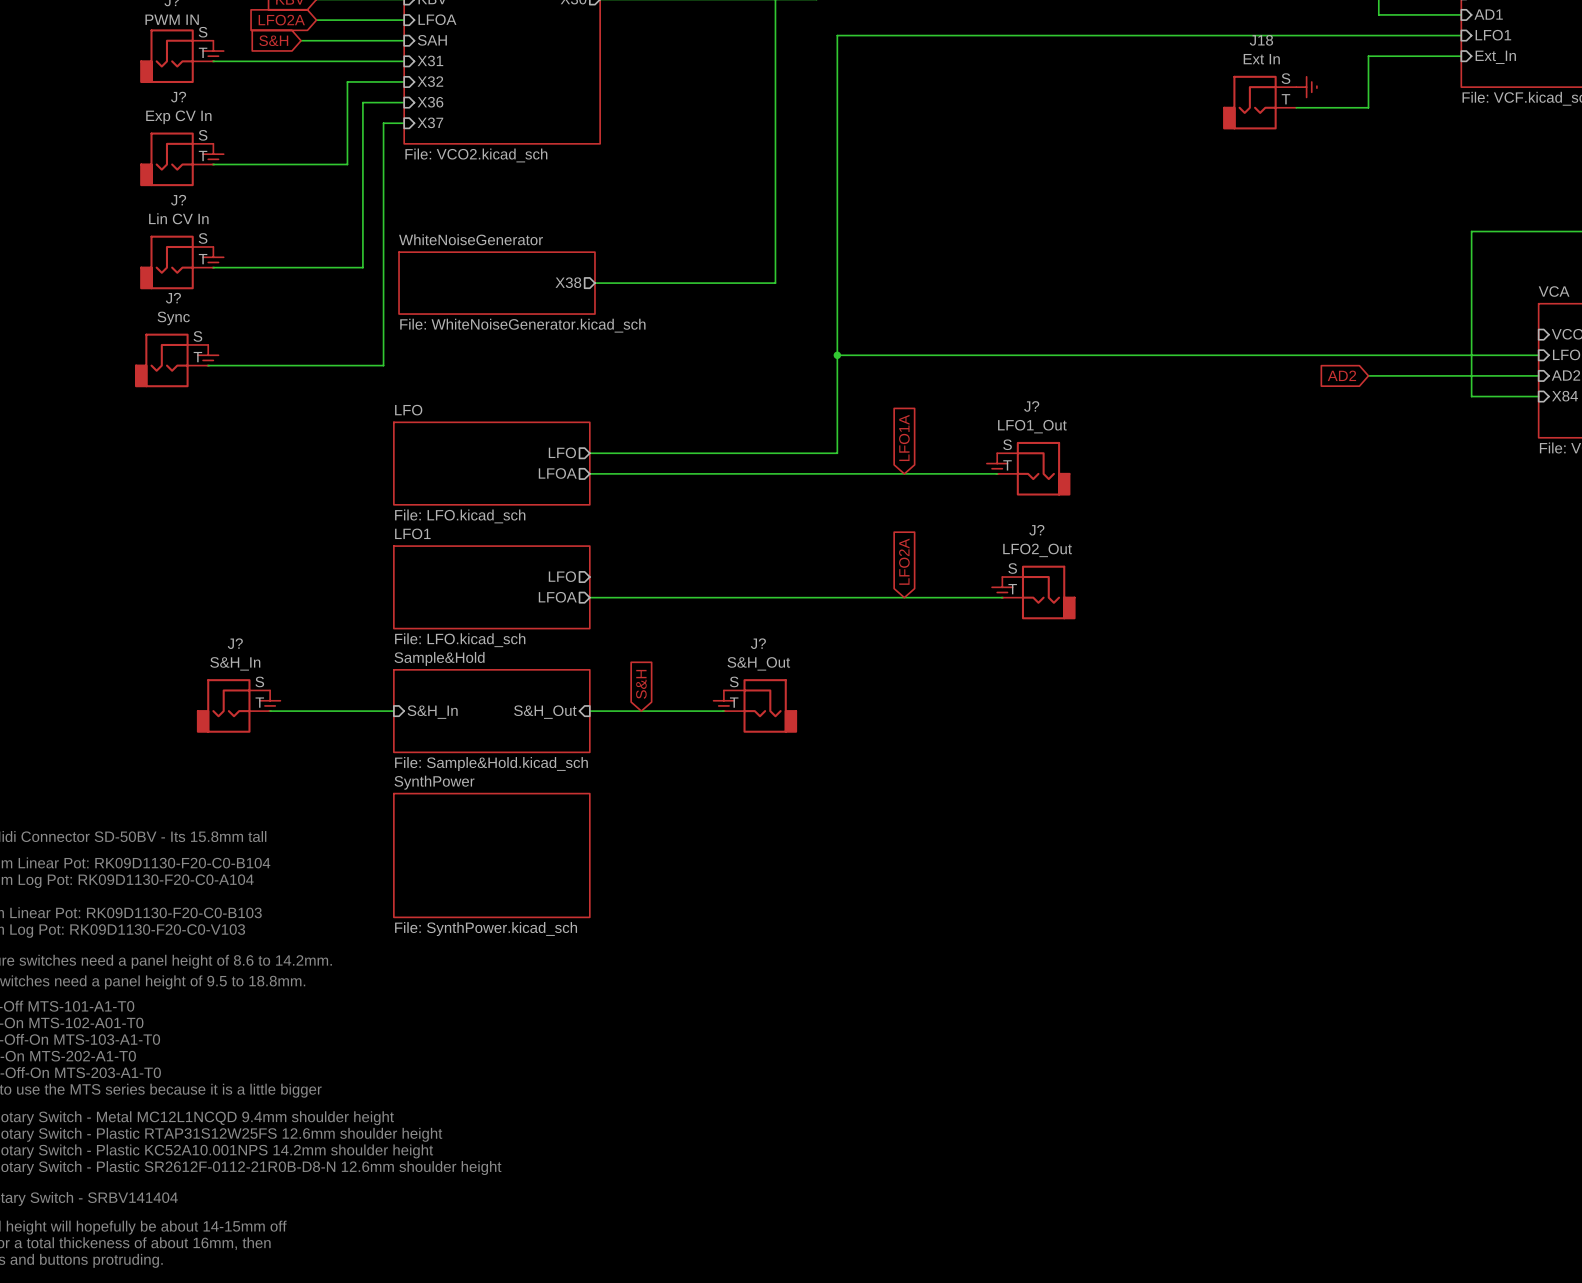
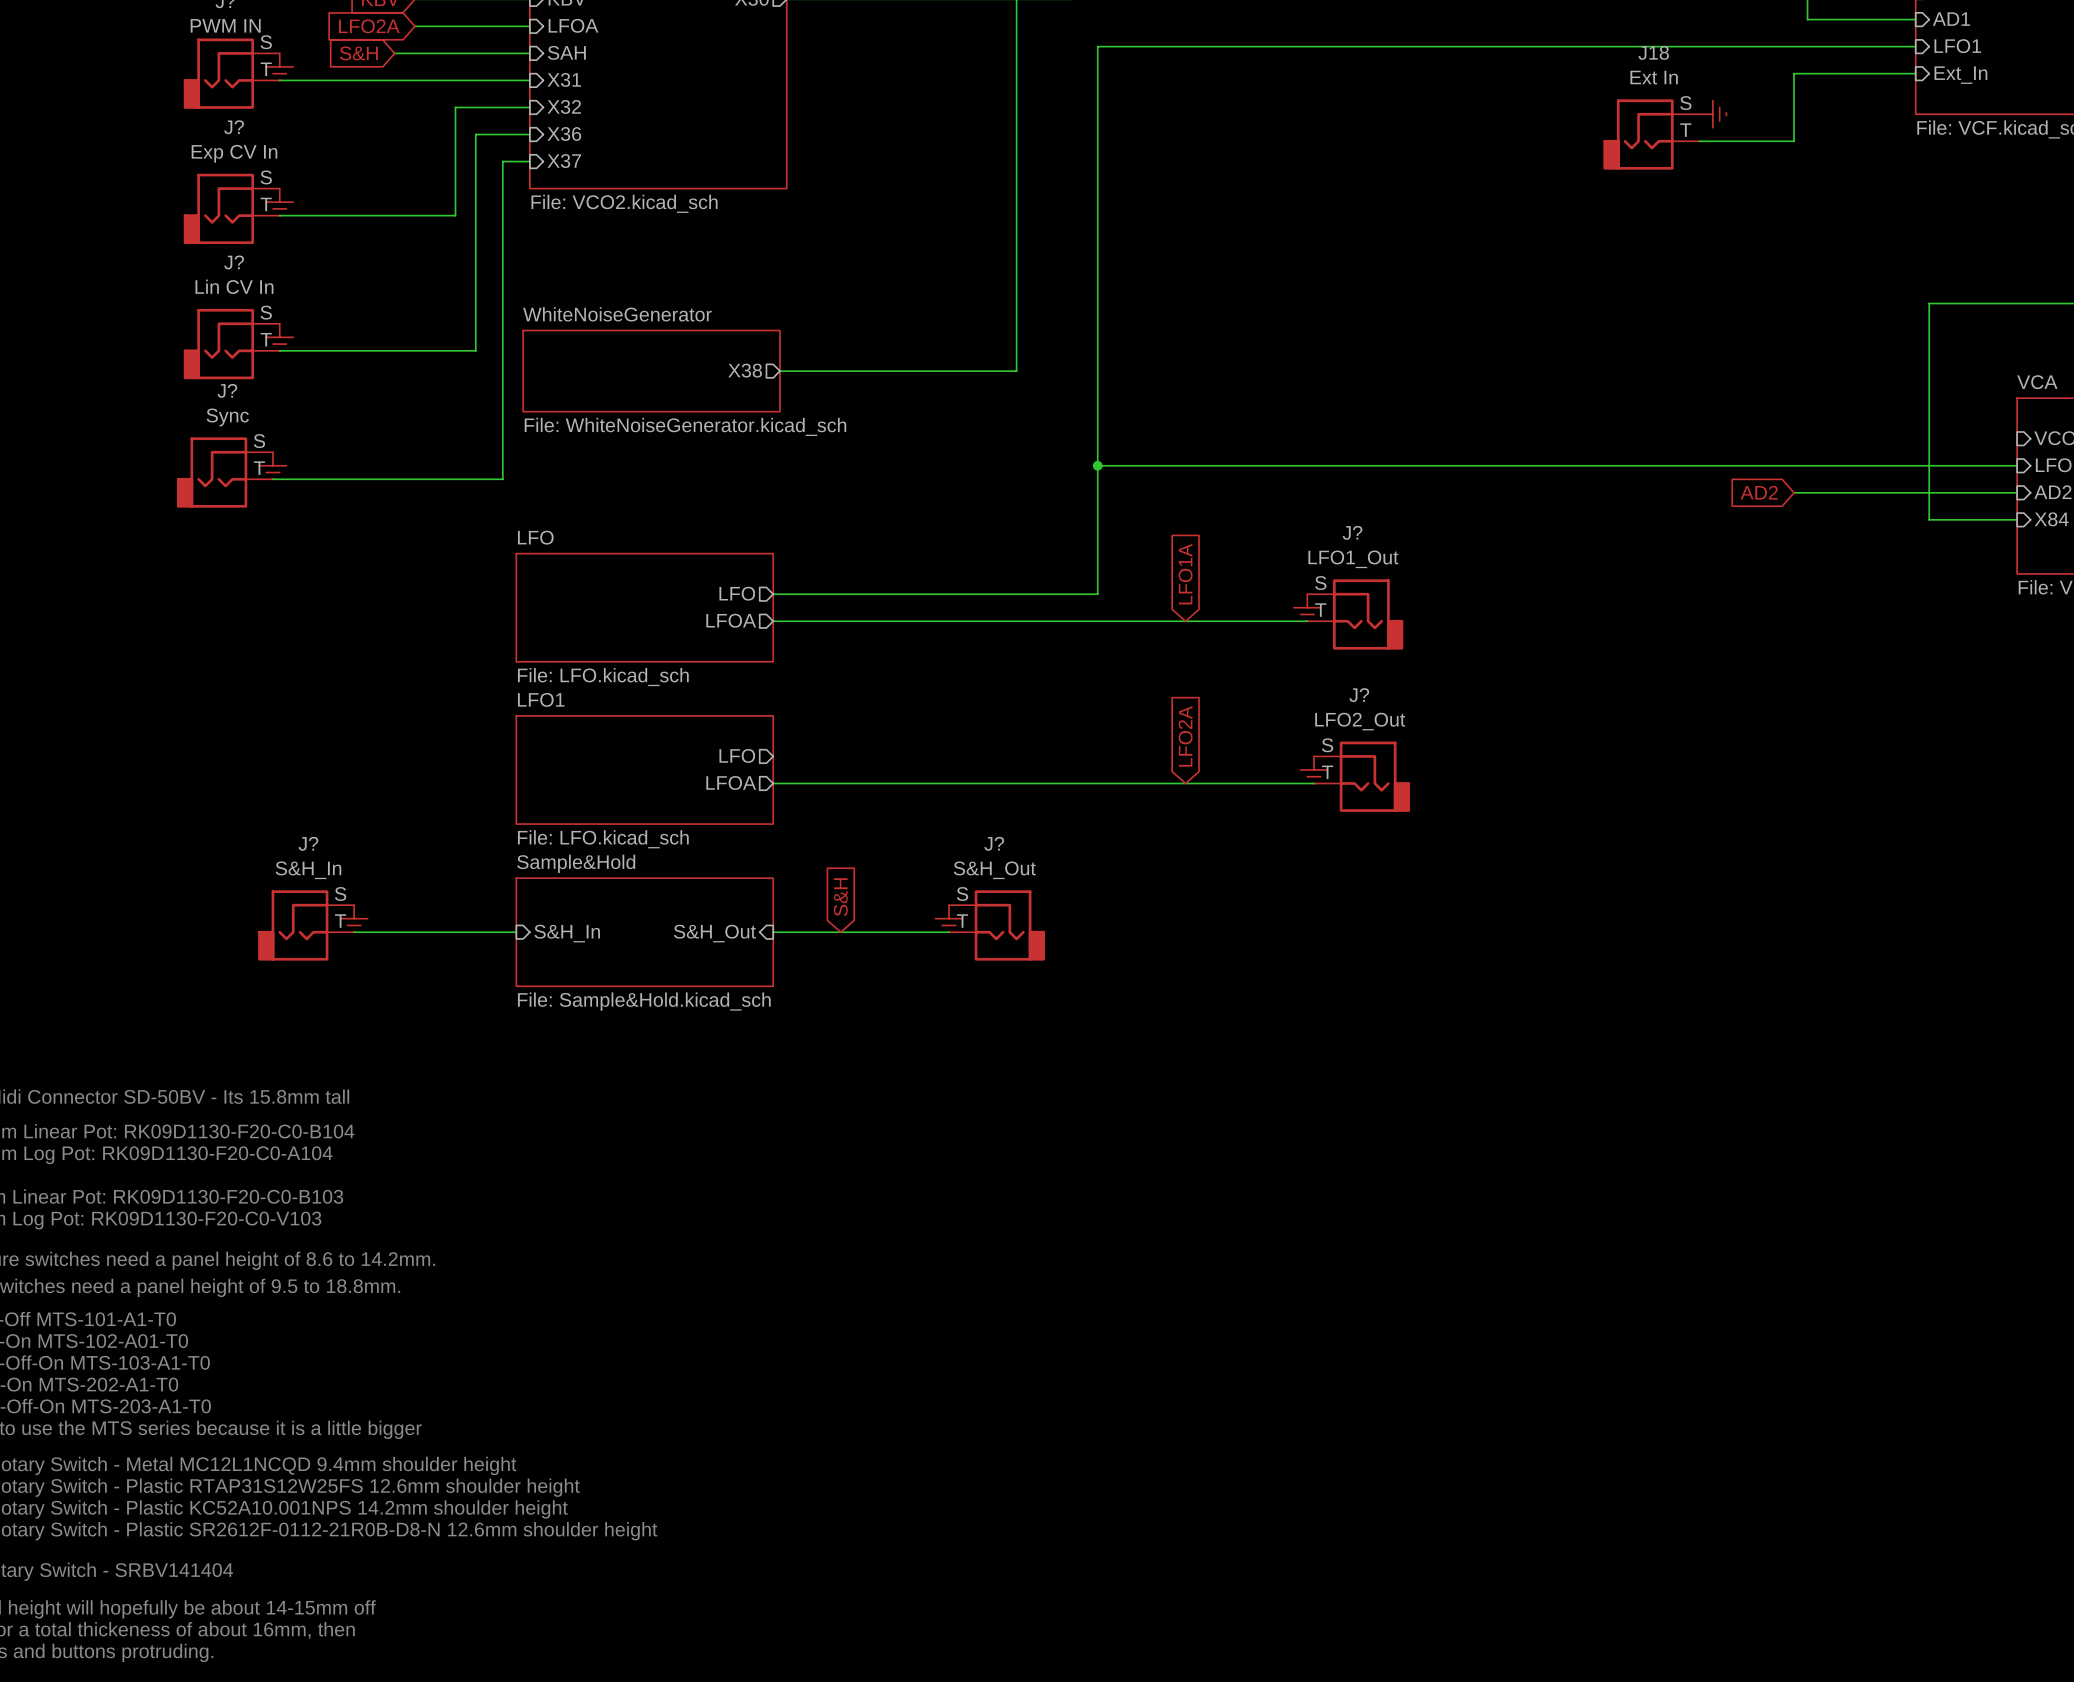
sheet SynthPower: File: SynthPower.kicad_sch (491, 855) -> none

